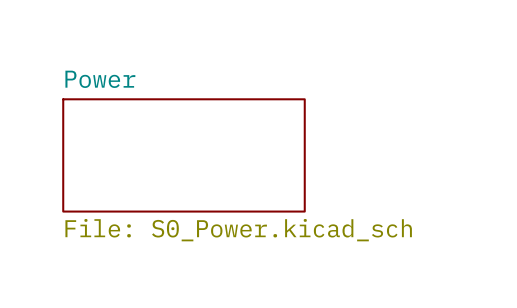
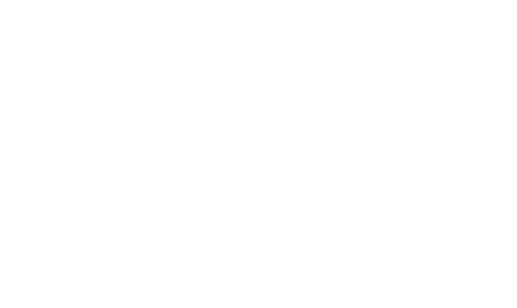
sheet Power: File: S0_Power.kicad_sch (183, 155) -> none

